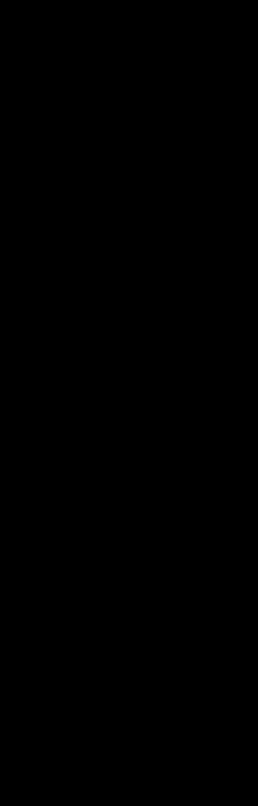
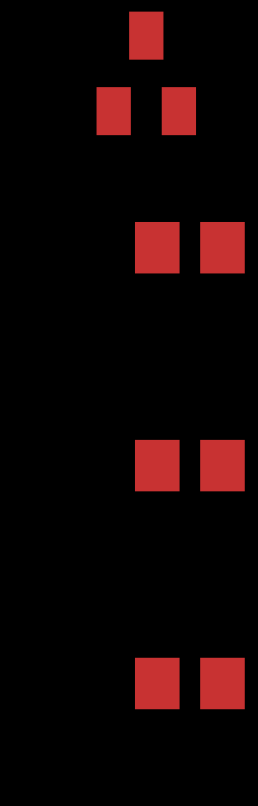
part: none -> (146, 73)
part: none -> (189, 247)
part: none -> (189, 465)
part: none -> (189, 683)

